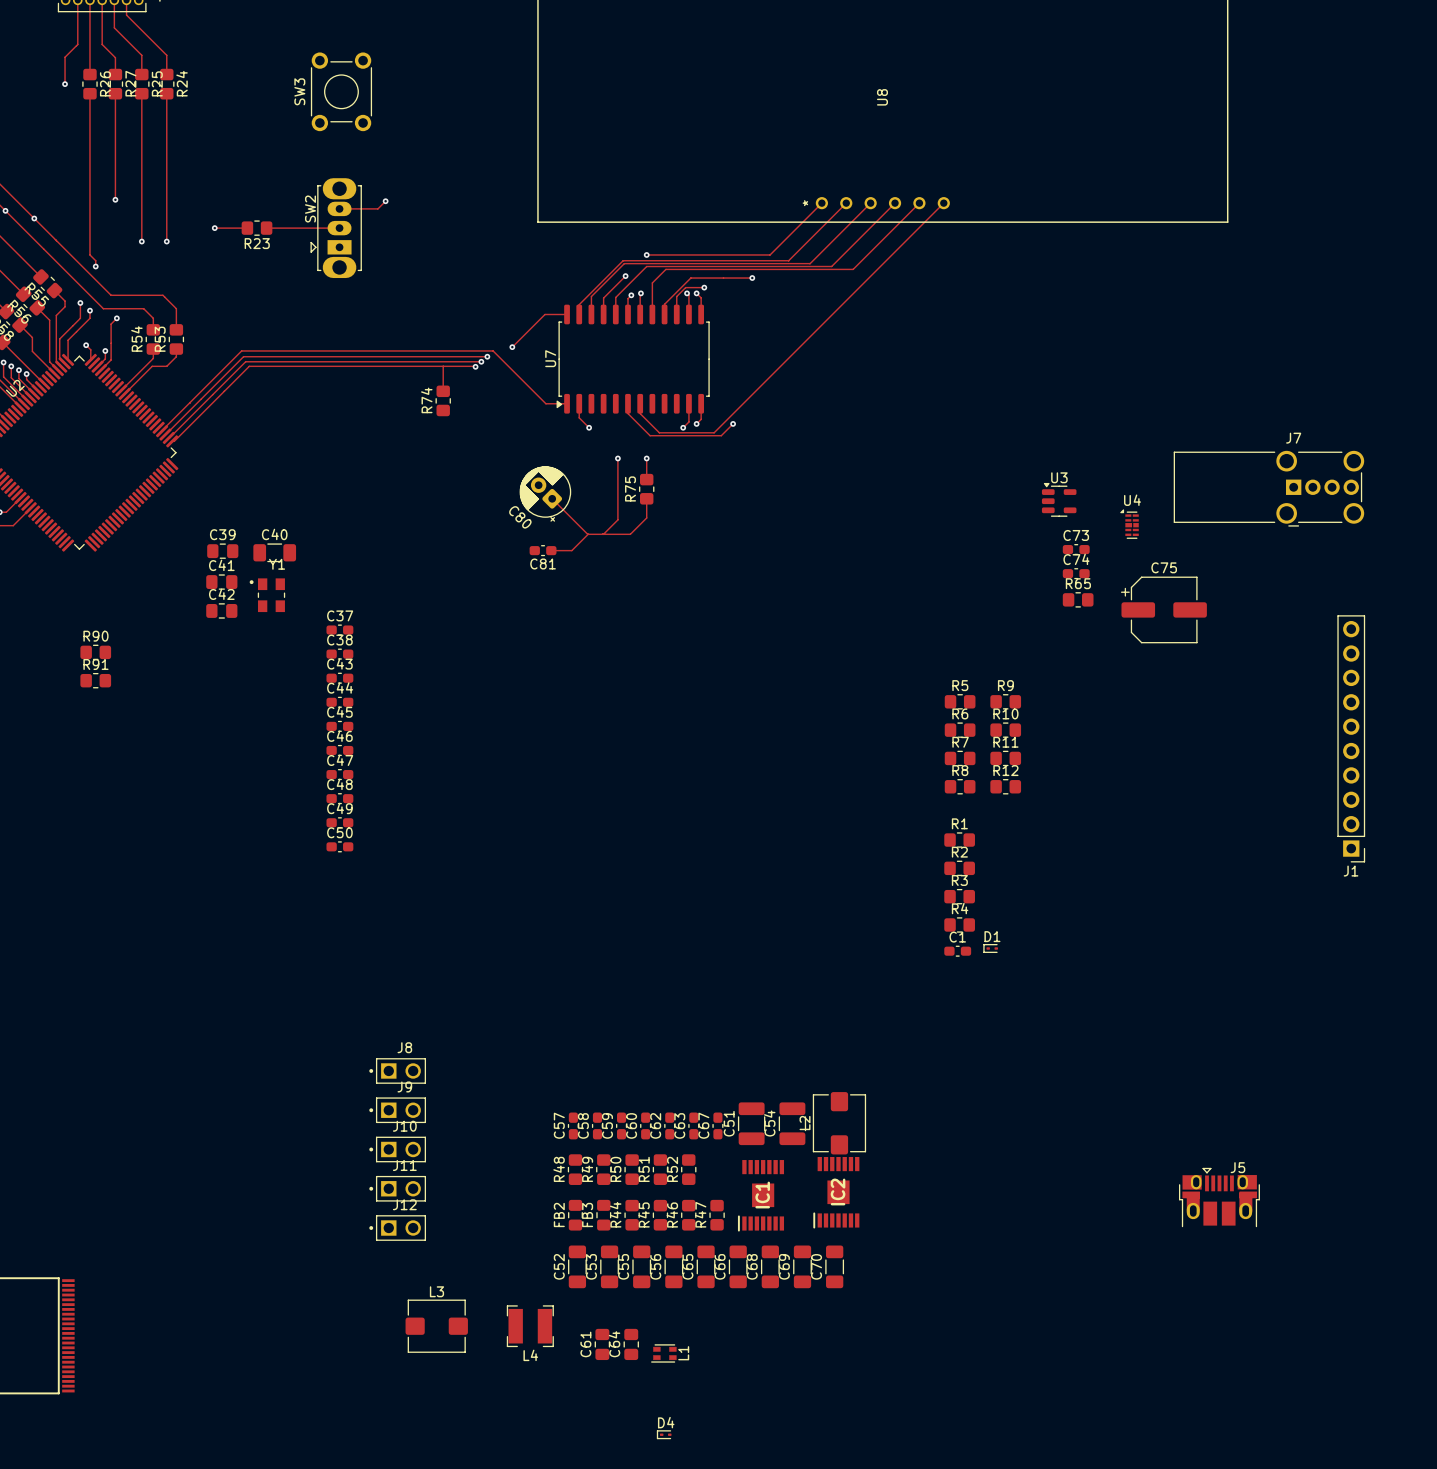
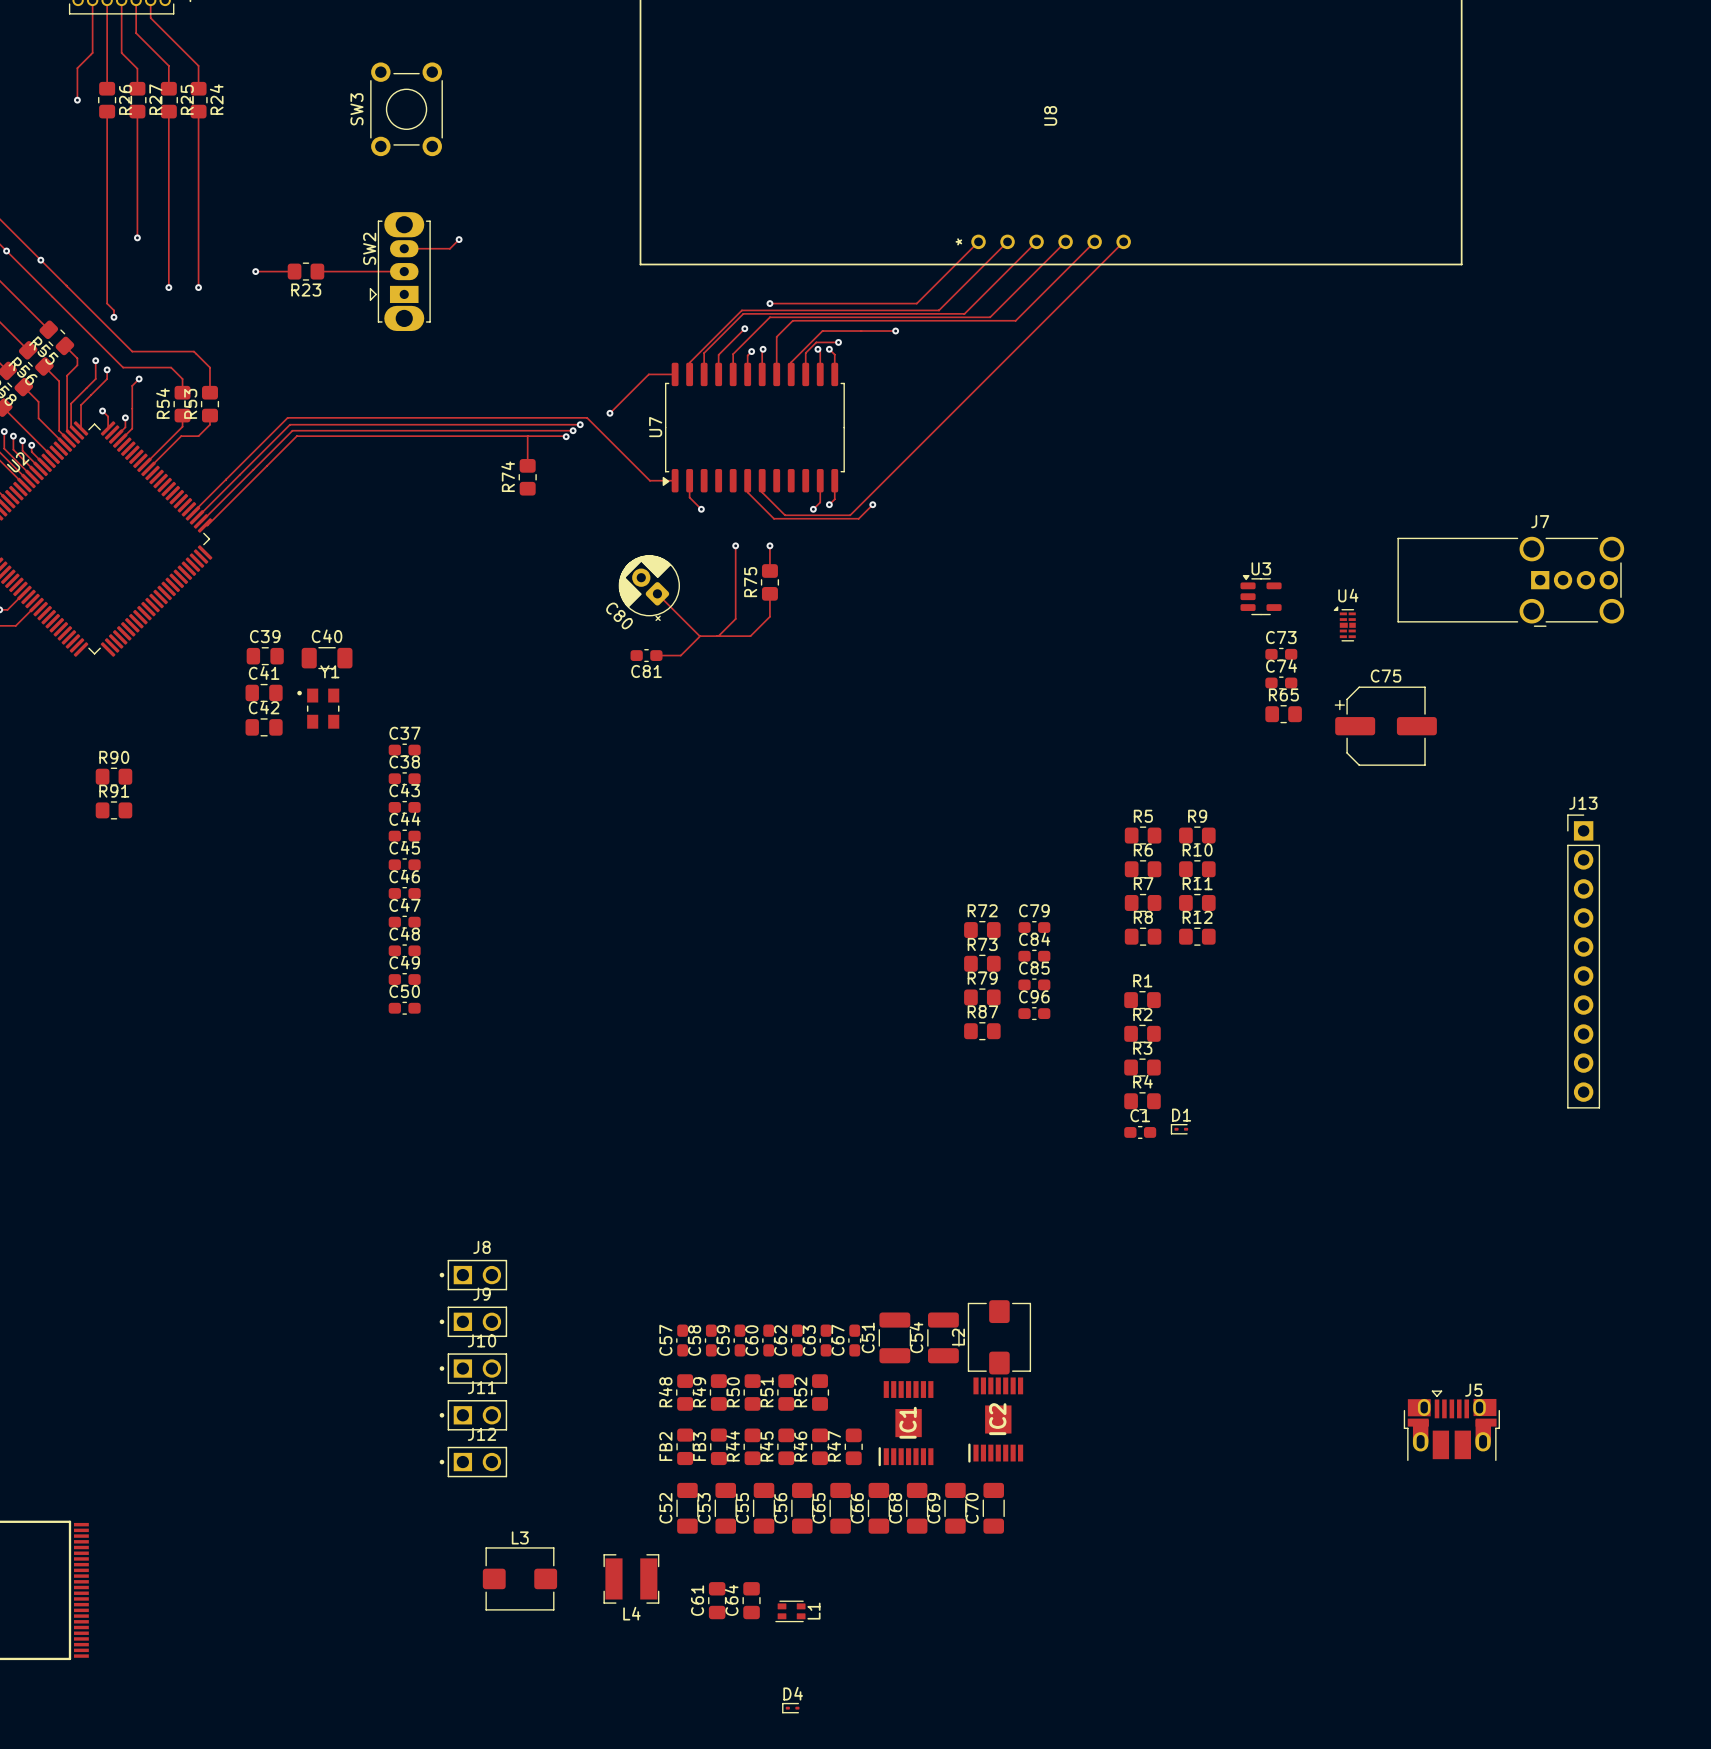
J1: (1351, 738) -> none
C79: none -> (1034, 927)
R72: none -> (982, 930)
C84: none -> (1034, 956)
J13: none -> (1583, 961)
R73: none -> (982, 963)
C85: none -> (1034, 984)
R79: none -> (982, 997)
C96: none -> (1034, 1013)
R87: none -> (982, 1031)

